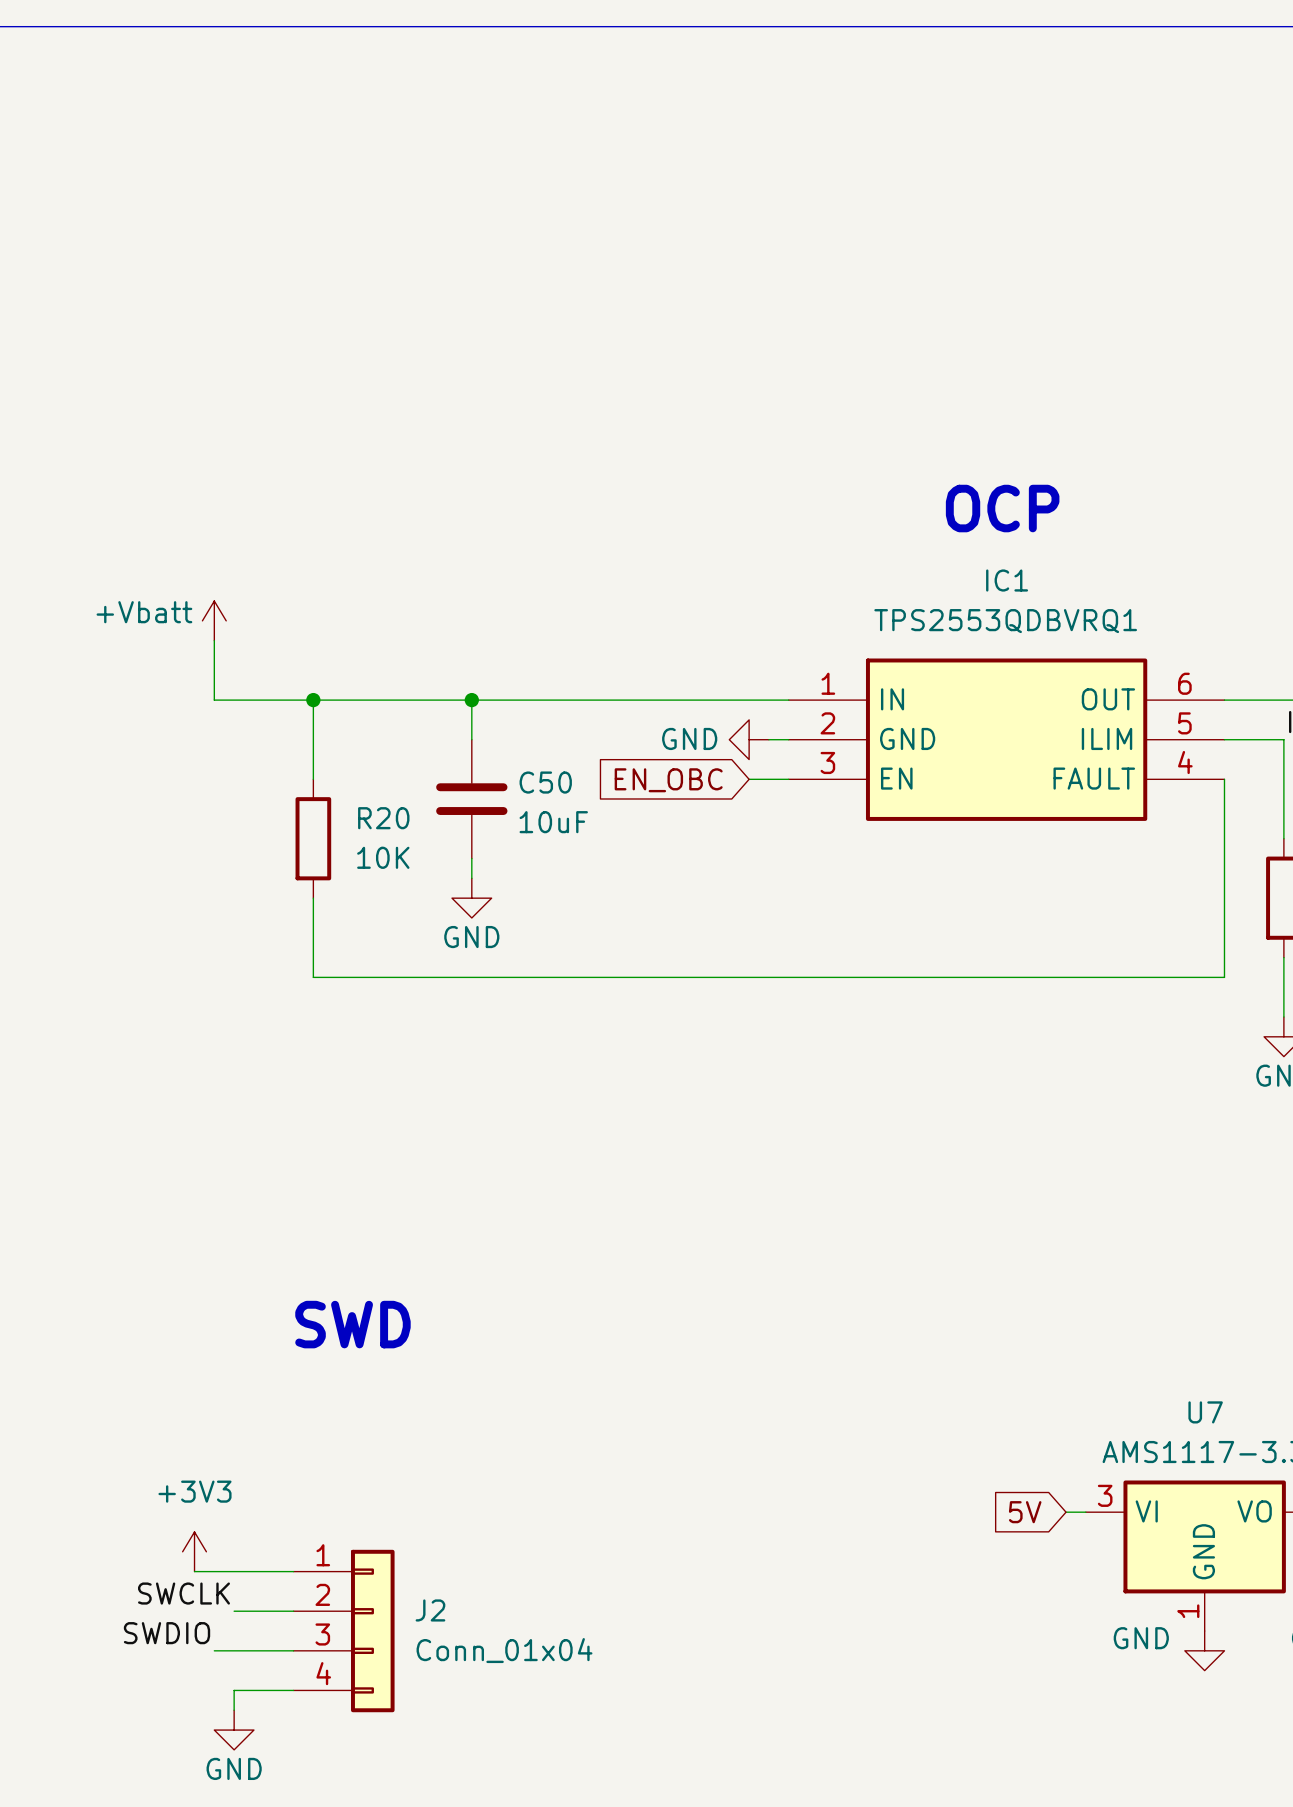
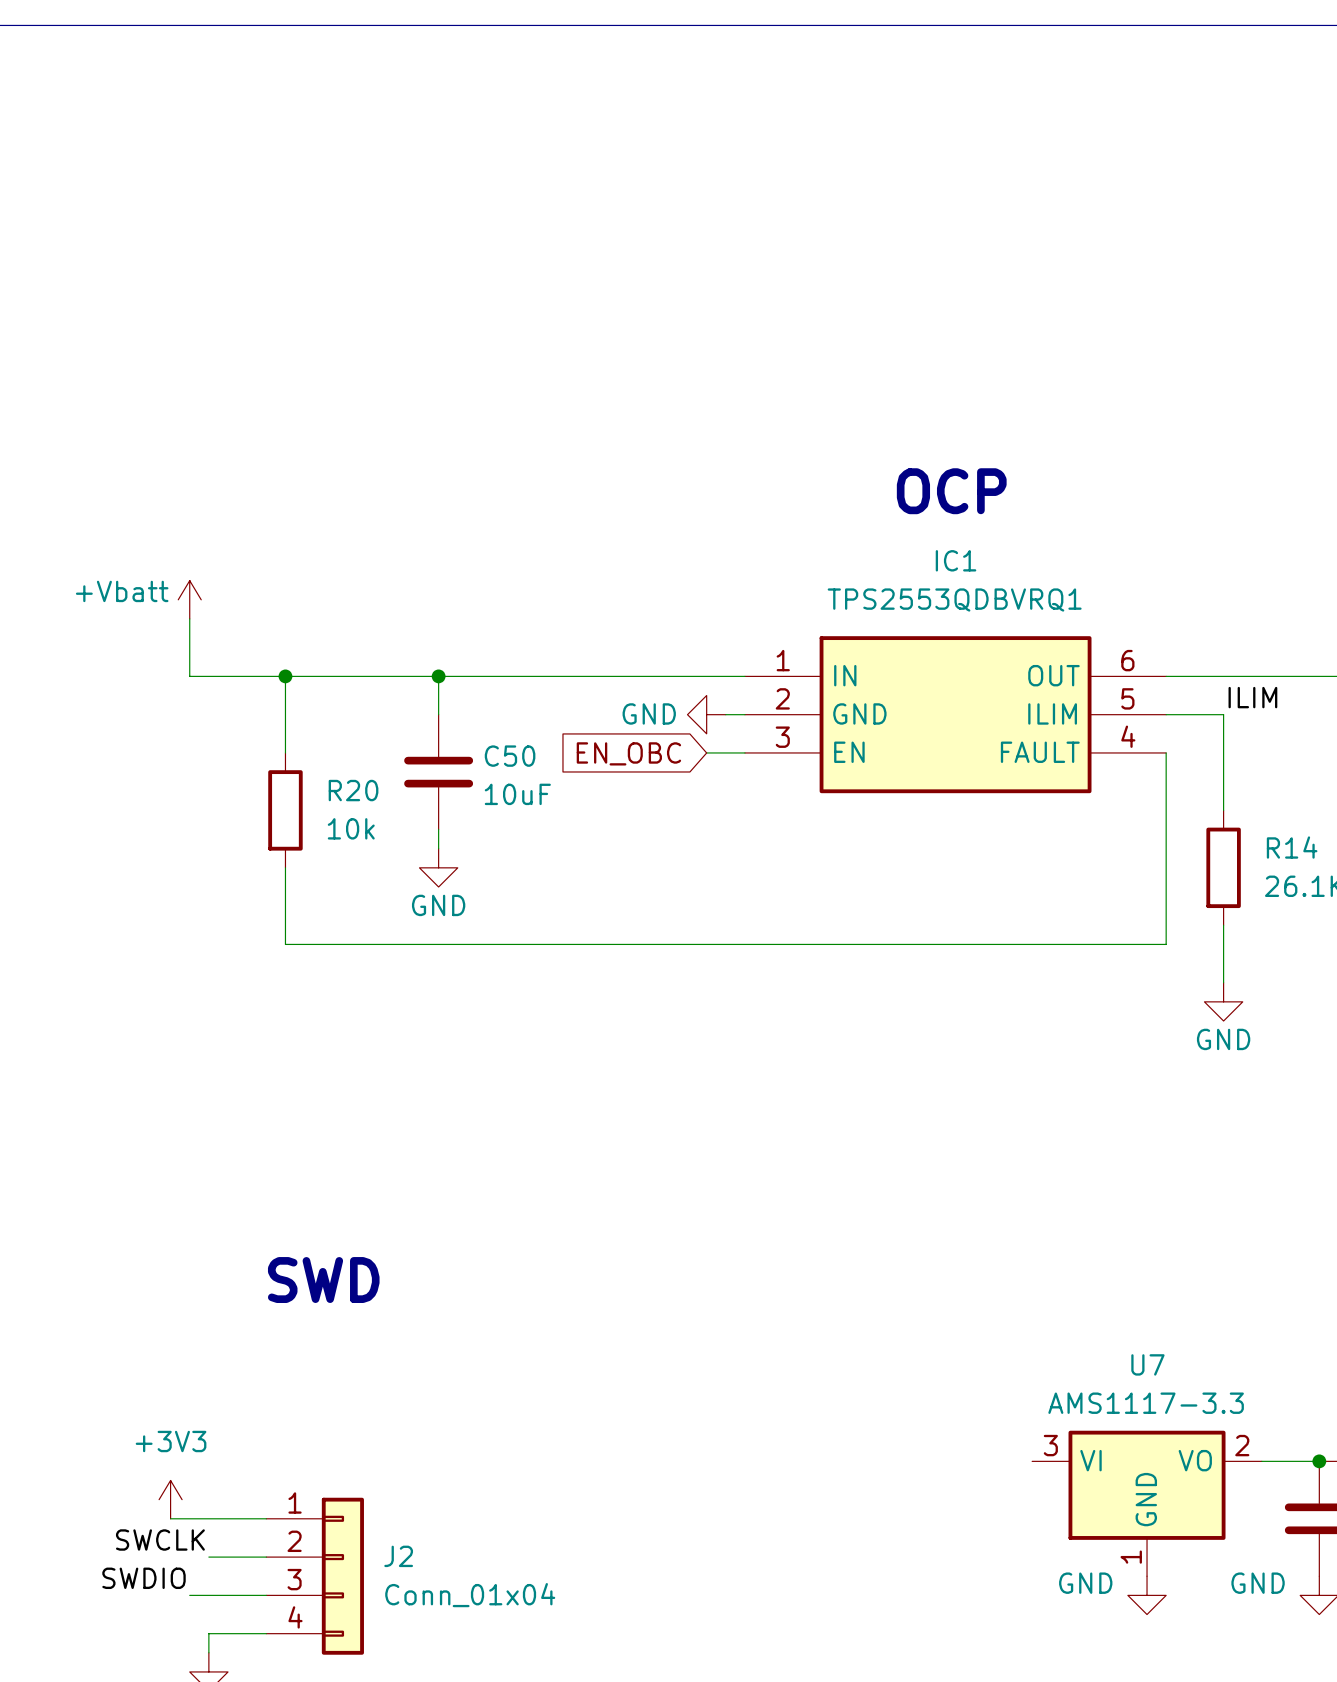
R20 value: 10K (383, 857) -> 10k (351, 828)
global label: 5V (1025, 1512) -> none
wire: (1066, 1512) (1085, 1512) -> none

